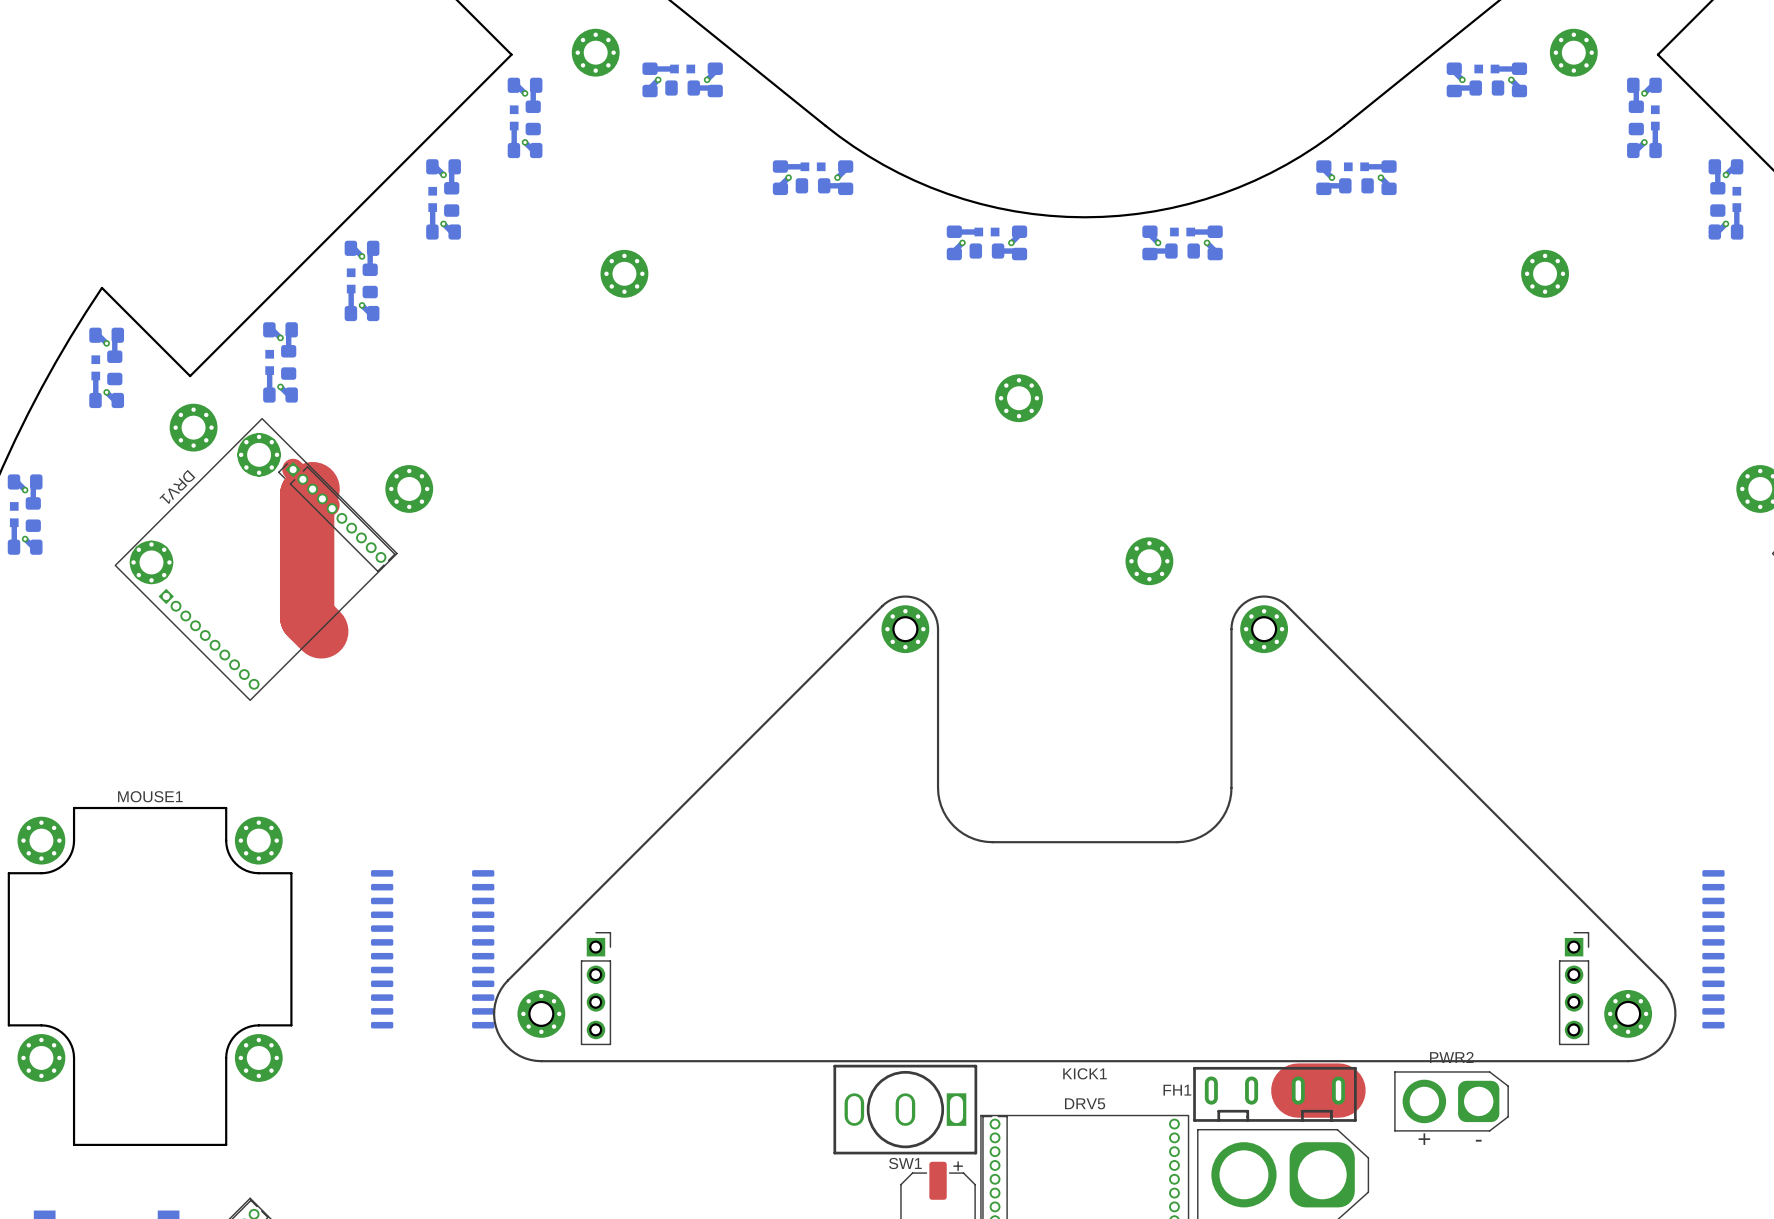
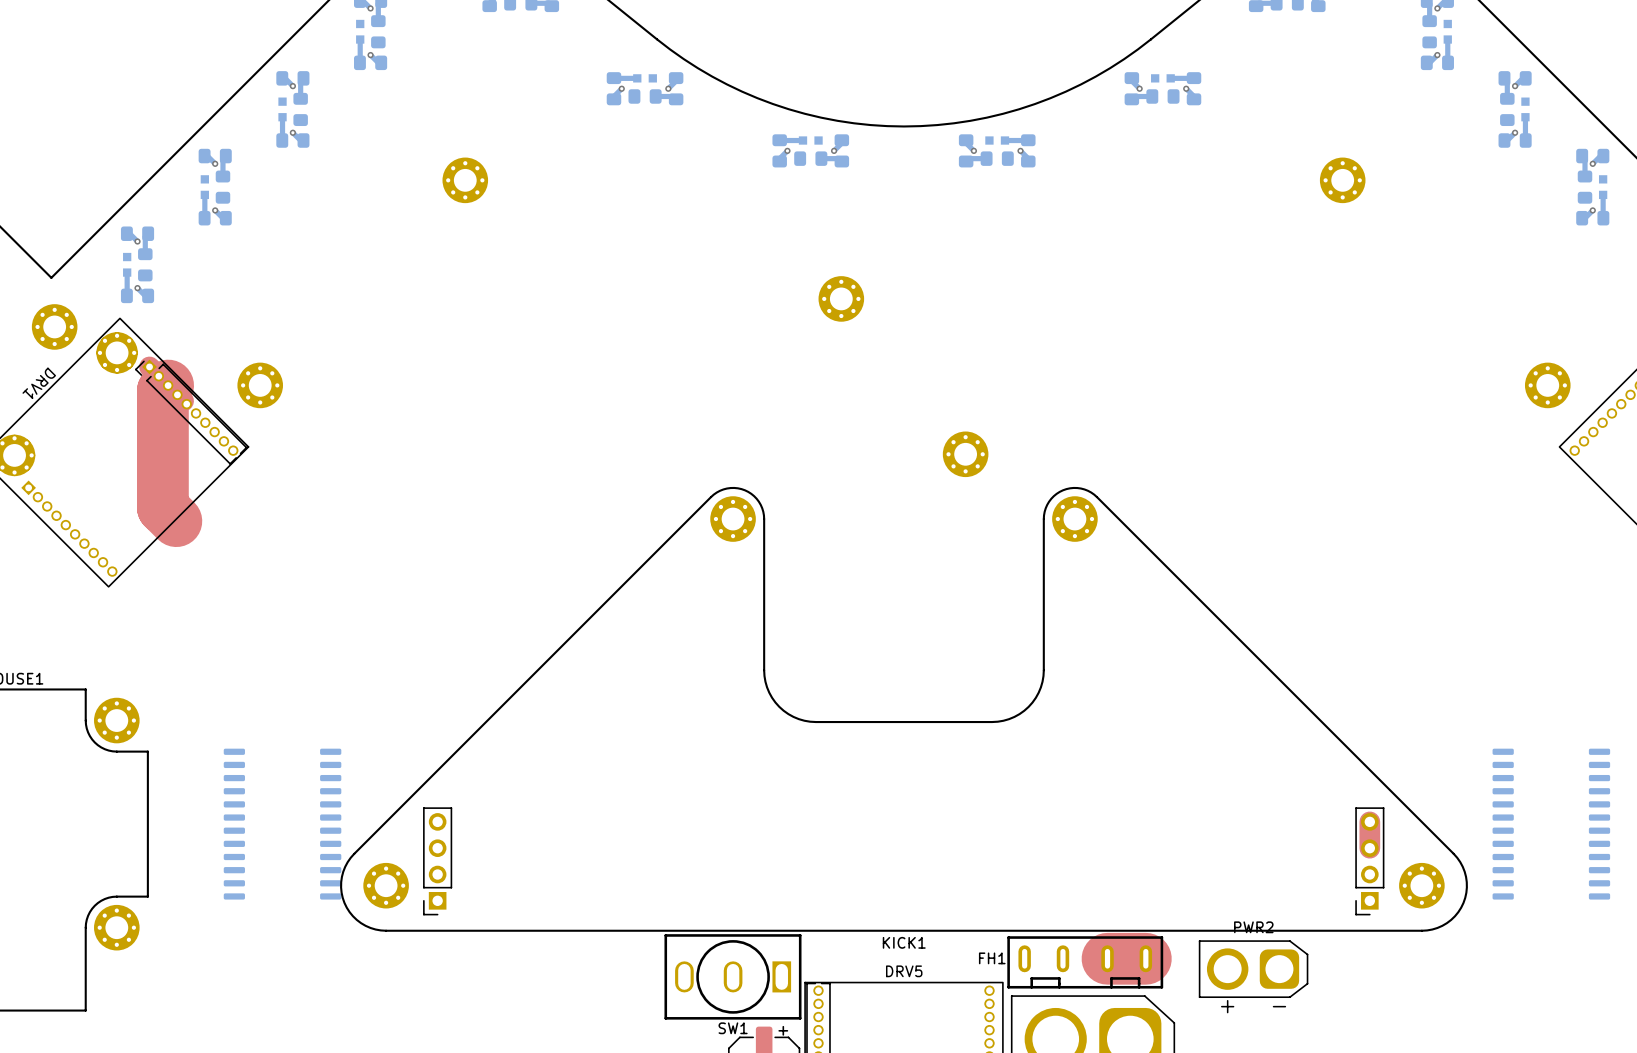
KICK1 footprint: [493, 595, 1677, 1063] -> [340, 486, 1468, 932]
round board edge: [892, 616, 919, 643] -> none
round board edge: [1251, 616, 1278, 643] -> none
round board edge: [589, 940, 603, 954] -> none
round board edge: [1567, 940, 1581, 954] -> none
top track: none -> (1369, 821) (1369, 848)
round board edge: [589, 968, 603, 982] -> none
round board edge: [1567, 968, 1581, 982] -> none
round board edge: [589, 995, 603, 1009] -> none
round board edge: [1567, 995, 1581, 1009] -> none
round board edge: [528, 1000, 555, 1027] -> none
round board edge: [1615, 1000, 1642, 1027] -> none
round board edge: [589, 1023, 603, 1037] -> none
round board edge: [1567, 1023, 1581, 1037] -> none

